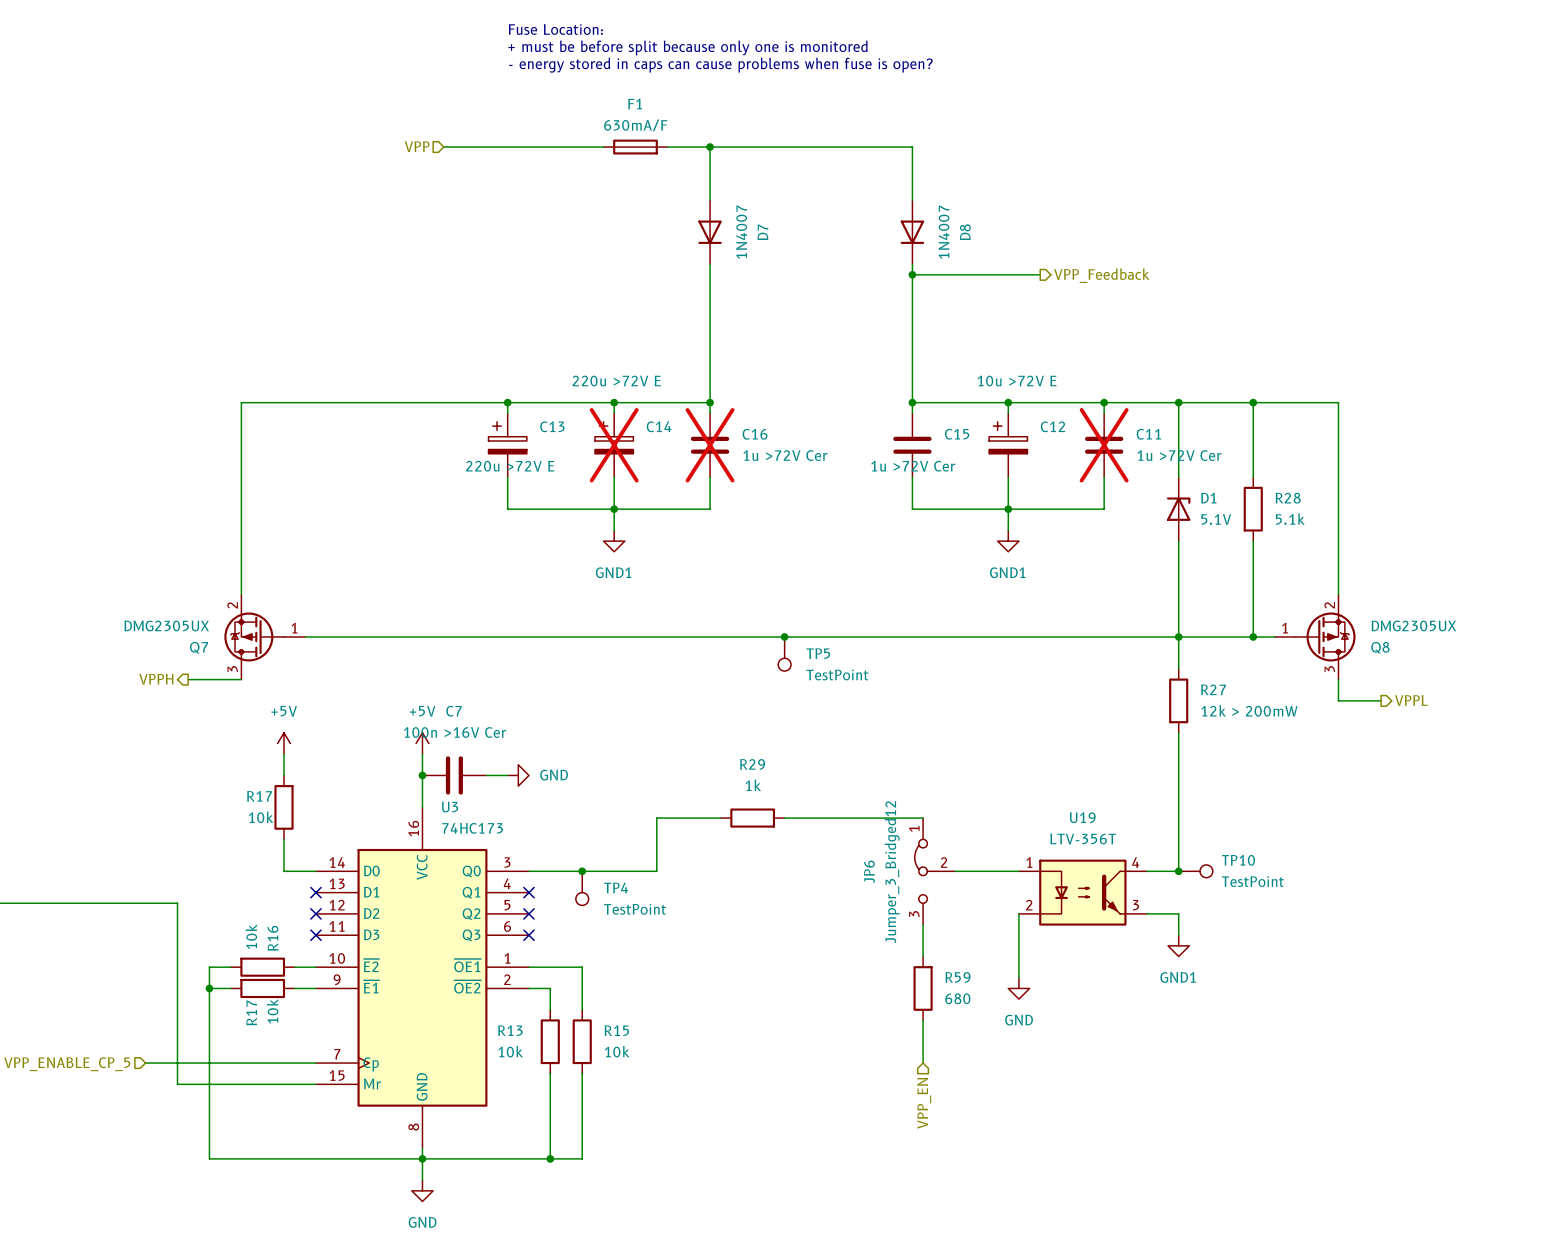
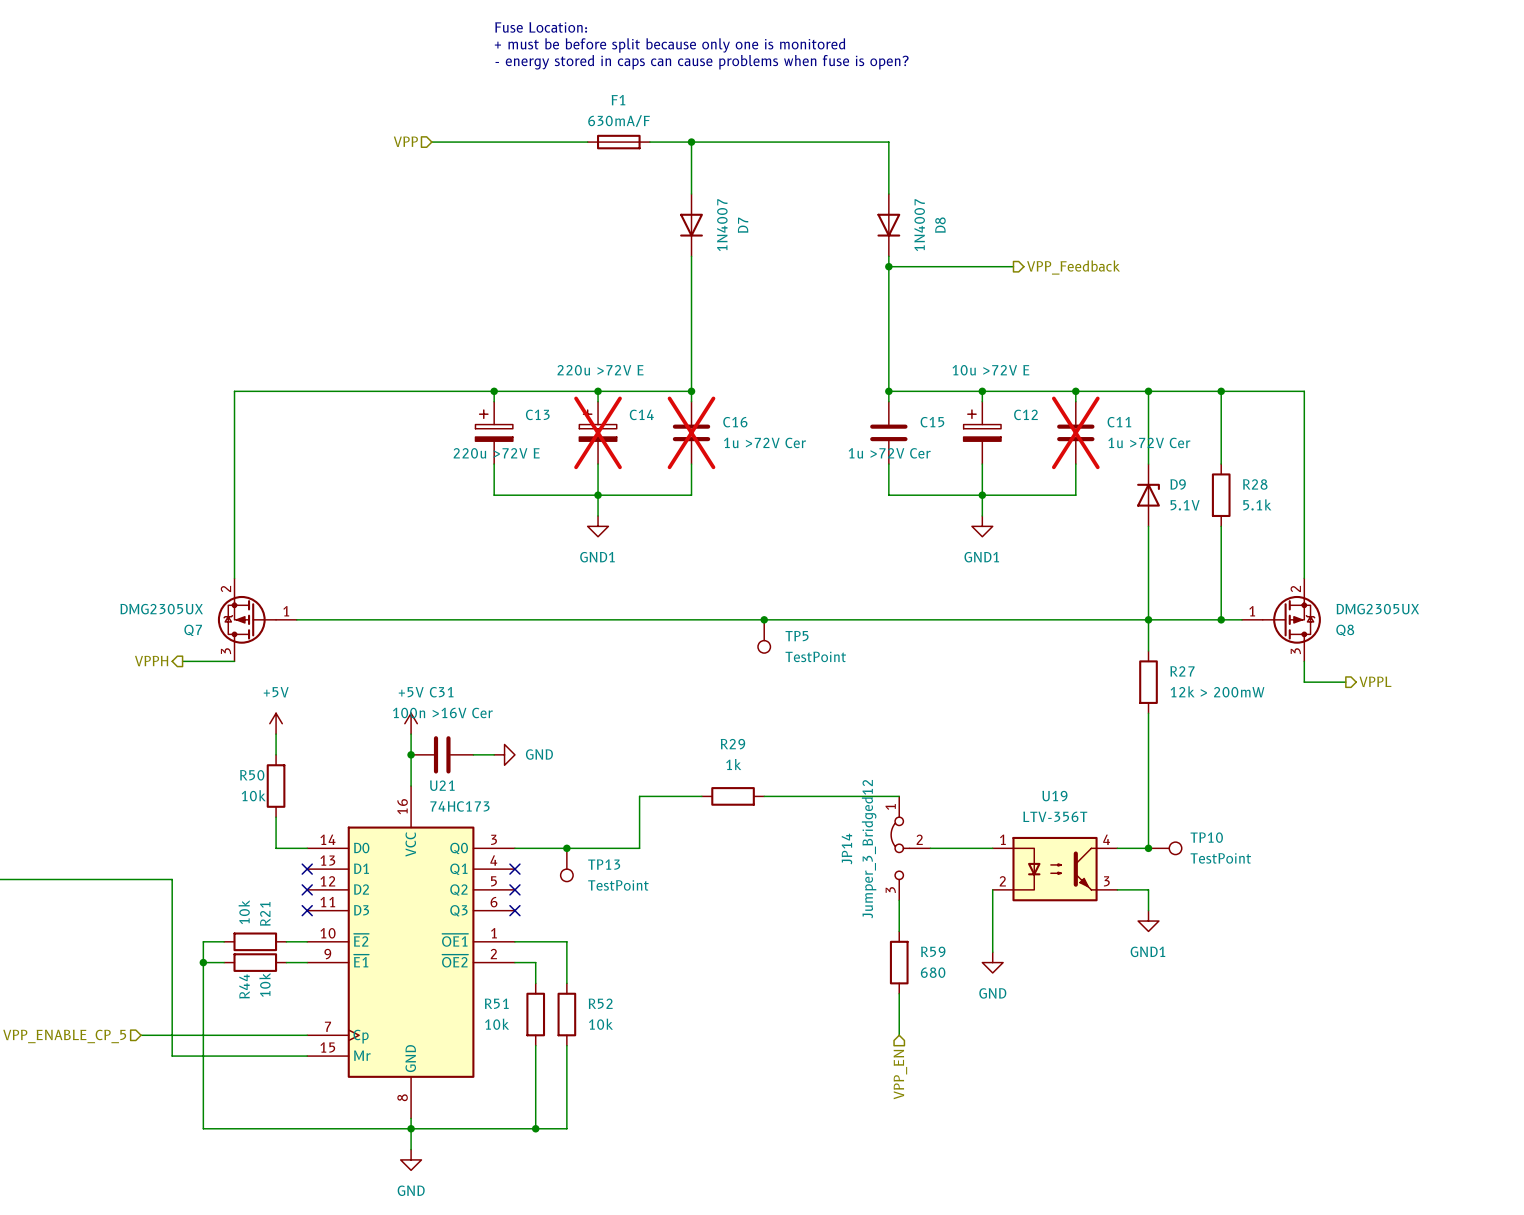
D1 name: D1 (1208, 498) -> D9 (1178, 484)
C7 name: C7 (454, 711) -> C31 (441, 692)
R17 name: R17 (259, 796) -> R50 (252, 775)
U3 name: U3 (450, 807) -> U21 (442, 785)
JP6 name: JP6 (869, 871) -> JP14 (846, 849)
TP4 name: TP4 (616, 887) -> TP13 (604, 864)
R16 name: R16 (273, 938) -> R21 (265, 913)
R17 name: R17 (251, 1012) -> R44 (244, 986)
R13 name: R13 (510, 1030) -> R51 (496, 1003)
R15 name: R15 (616, 1030) -> R52 (600, 1003)

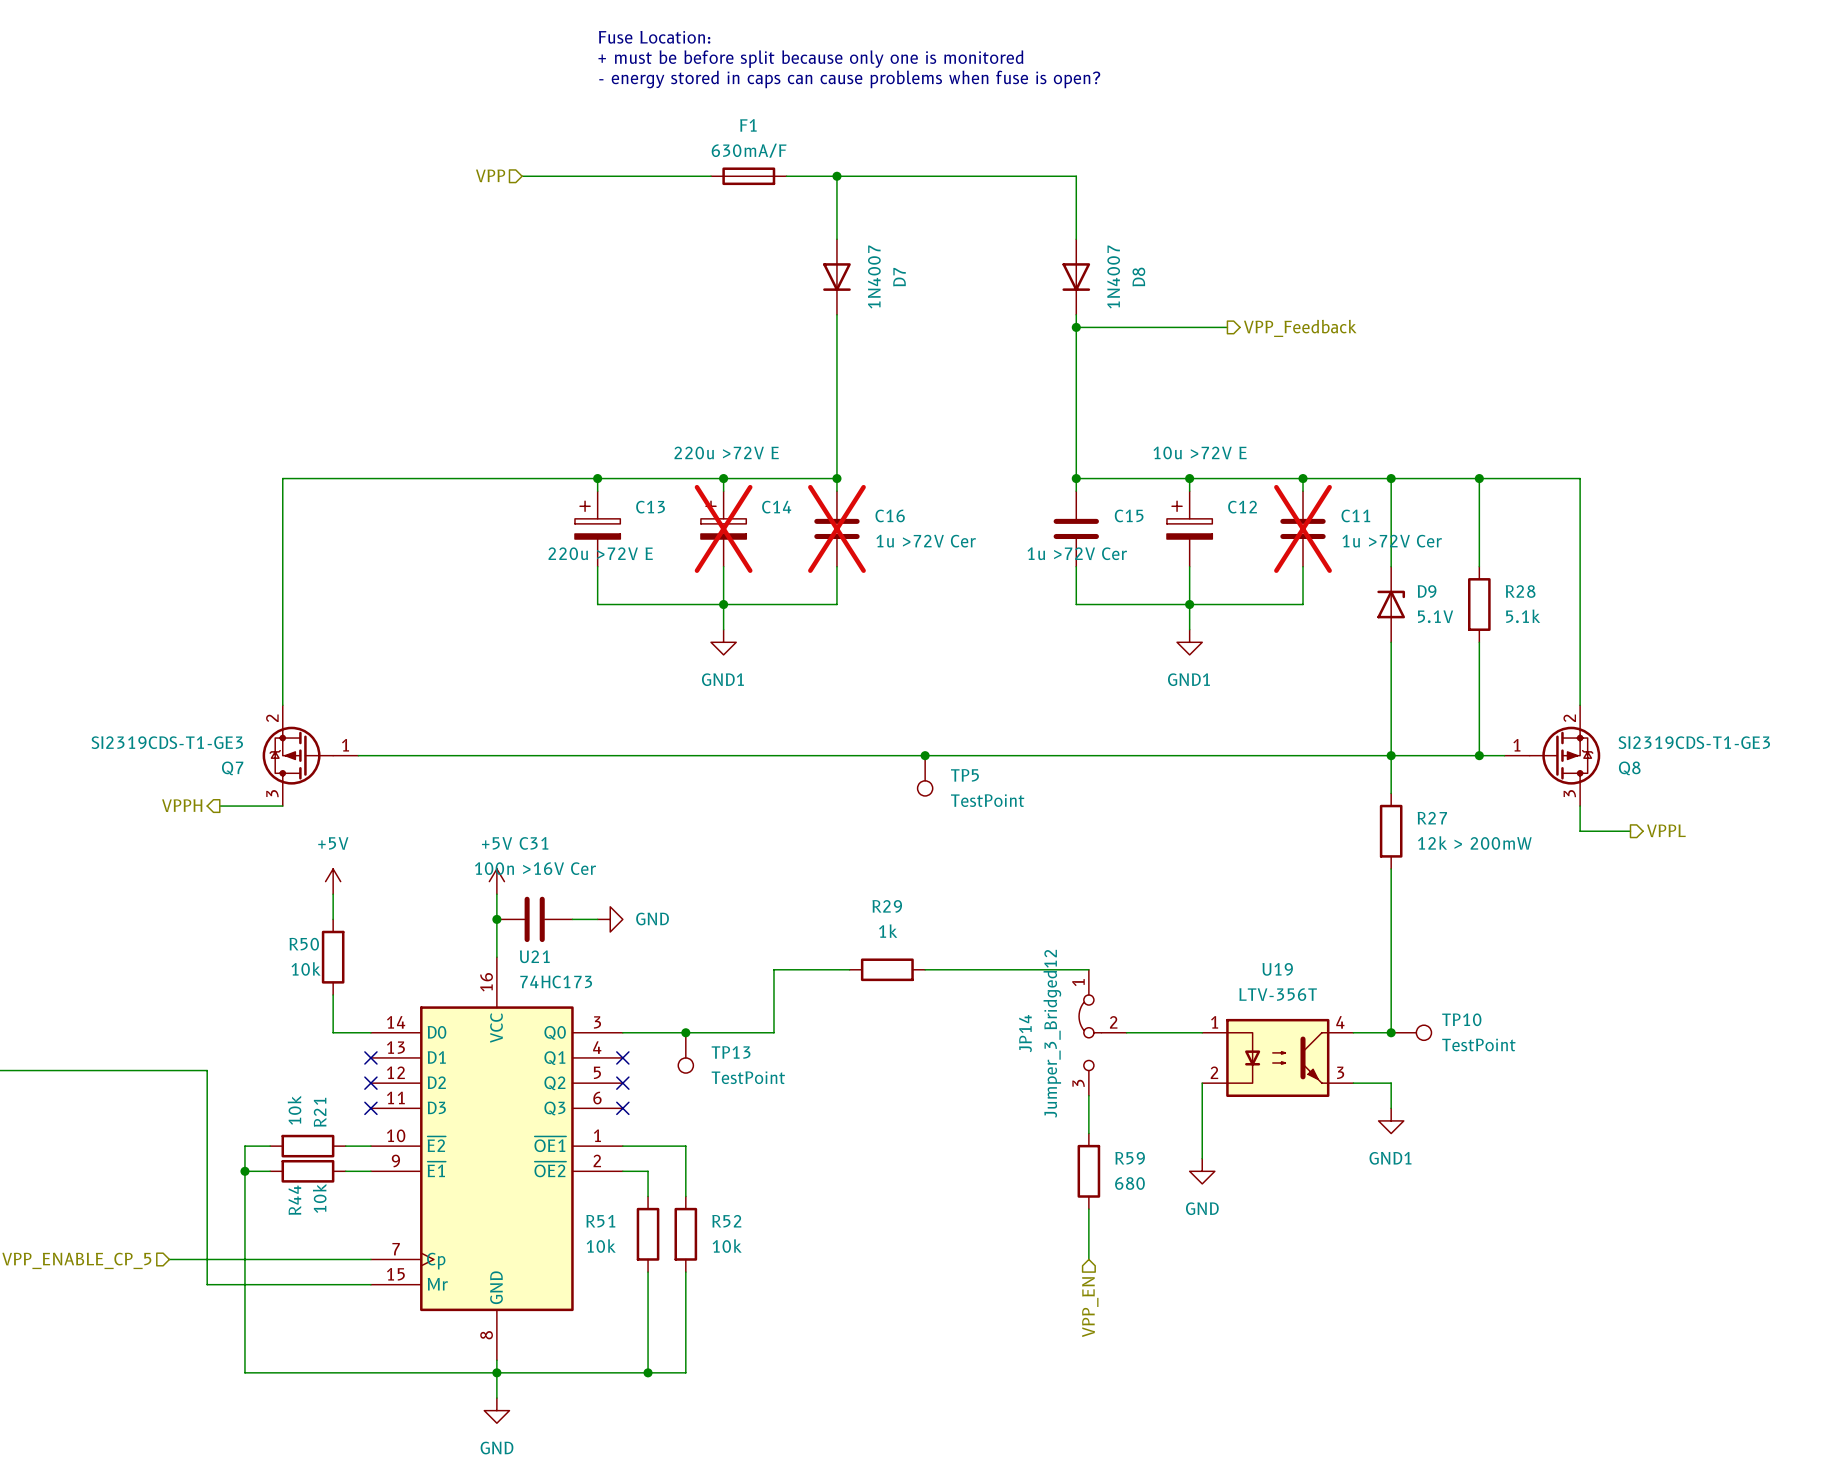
Q7 value: DMG2305UX (161, 609) -> SI2319CDS-T1-GE3 (167, 742)
Q8 value: DMG2305UX (1377, 609) -> SI2319CDS-T1-GE3 (1694, 742)

